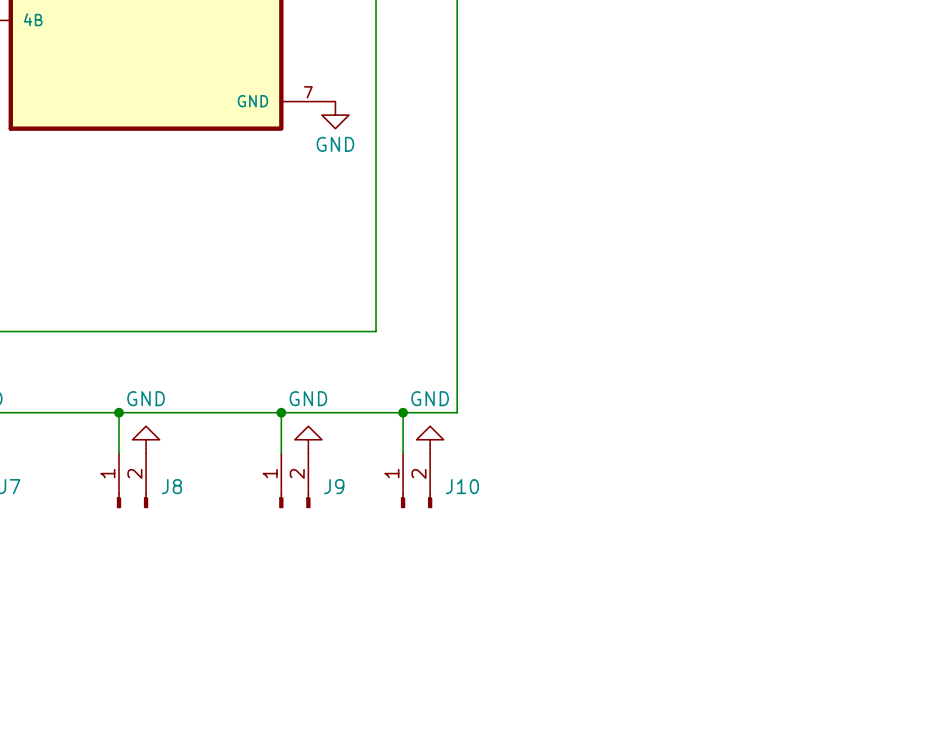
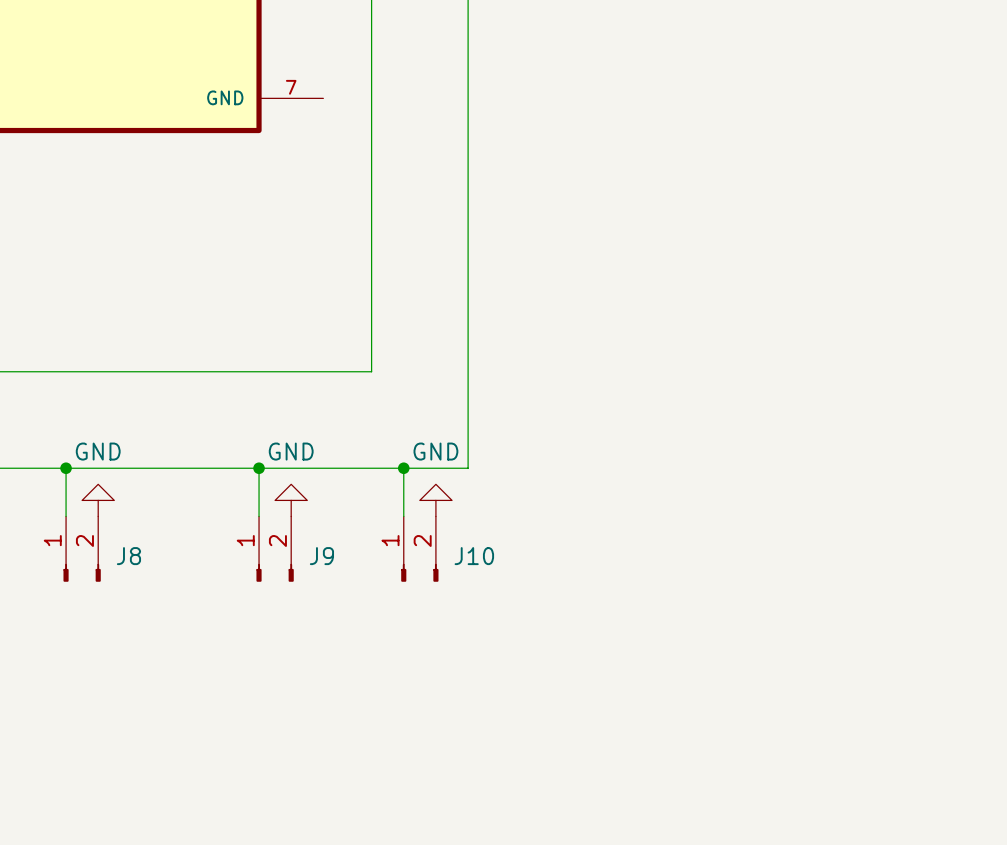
power symbol: GND (335, 115) -> none

